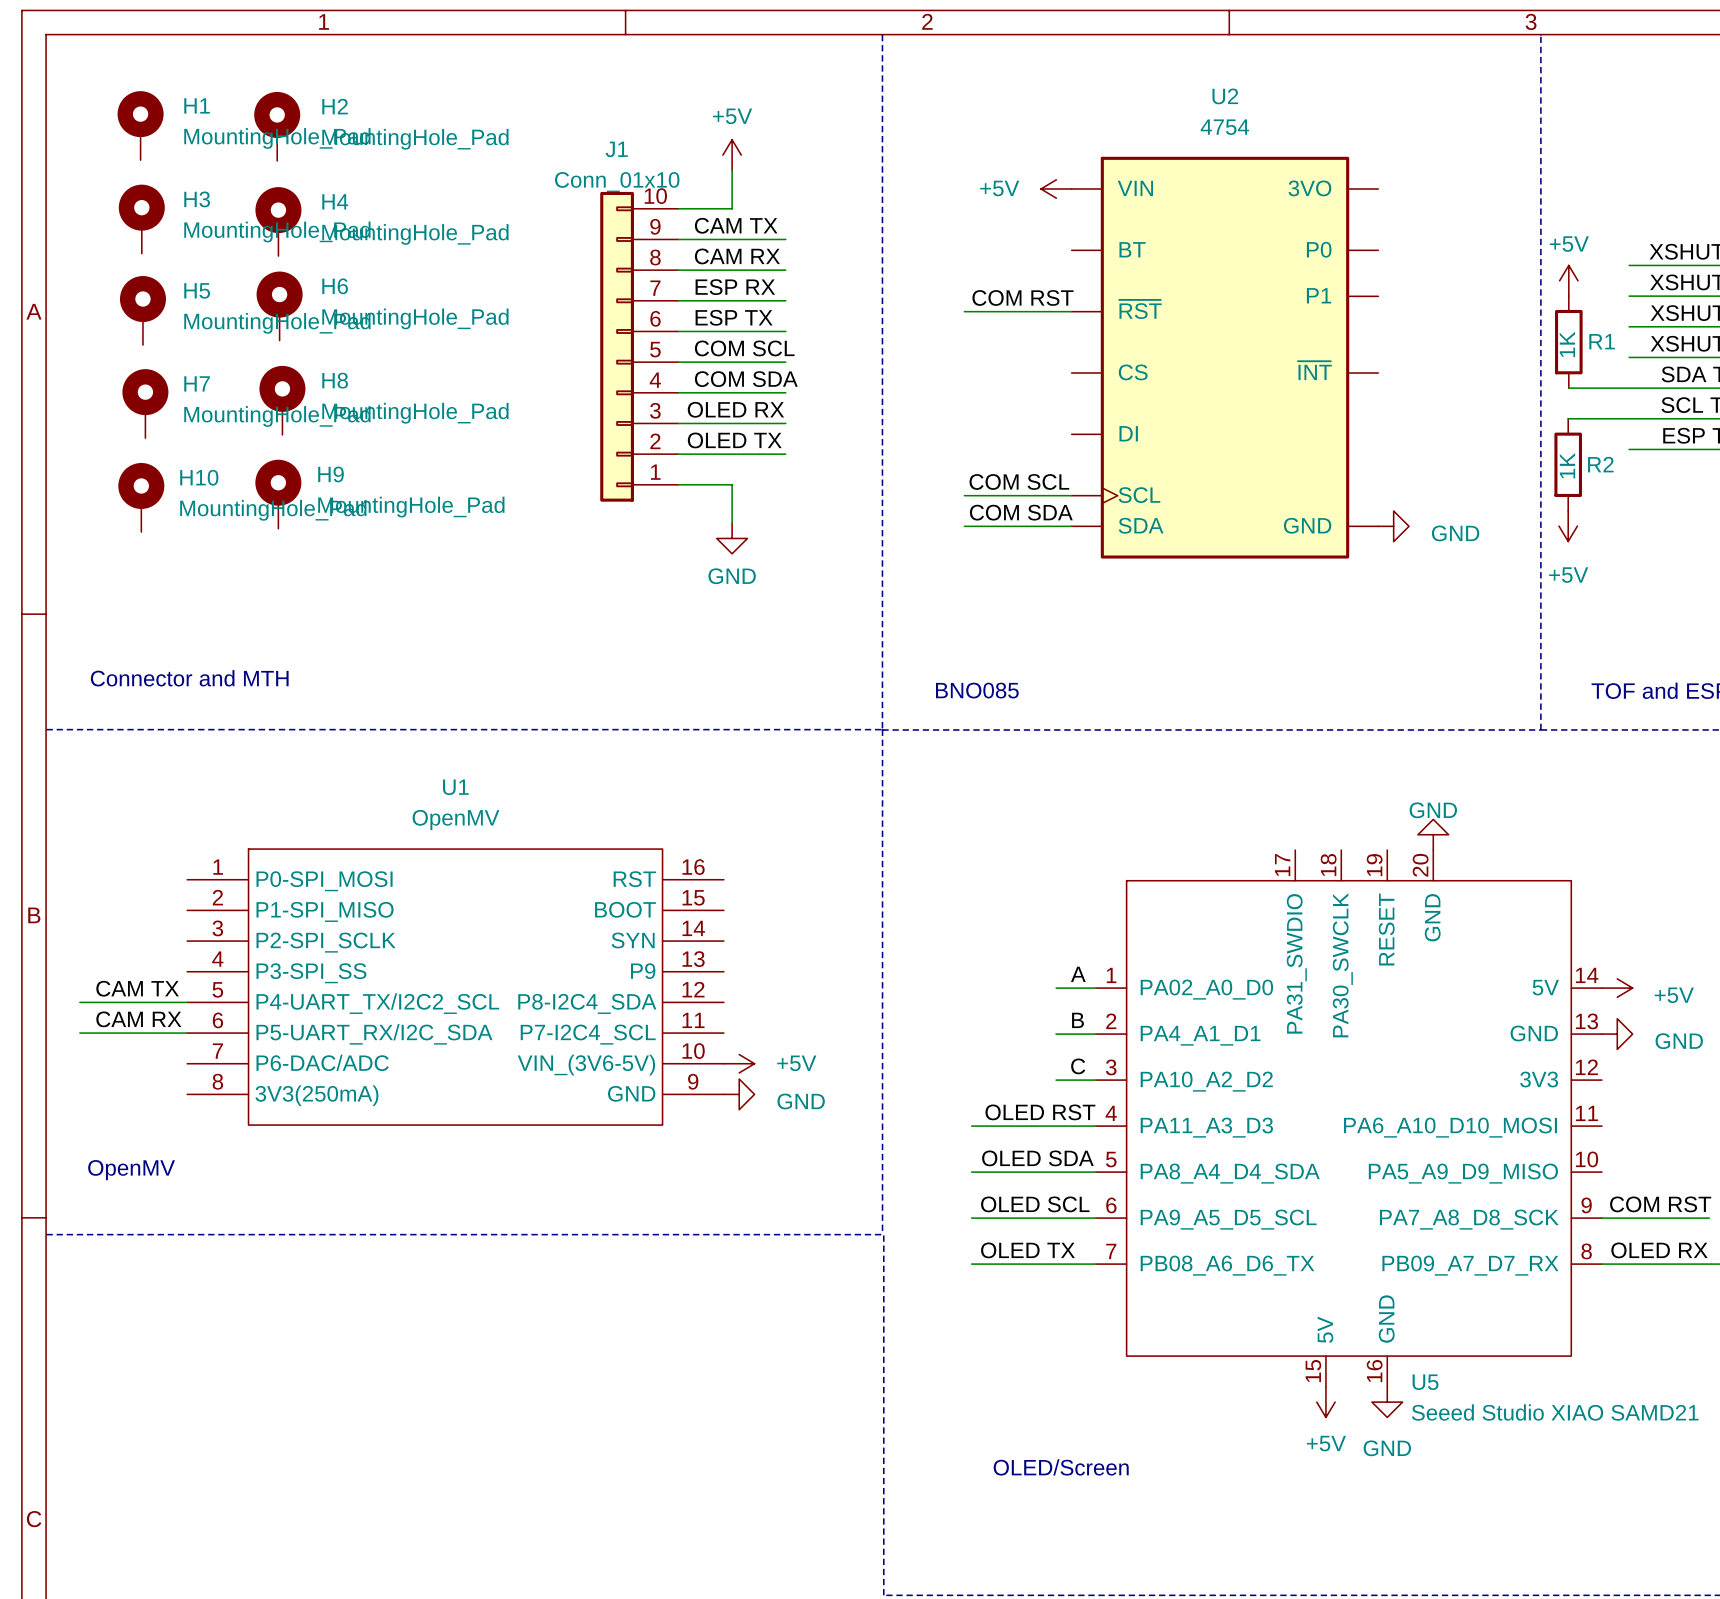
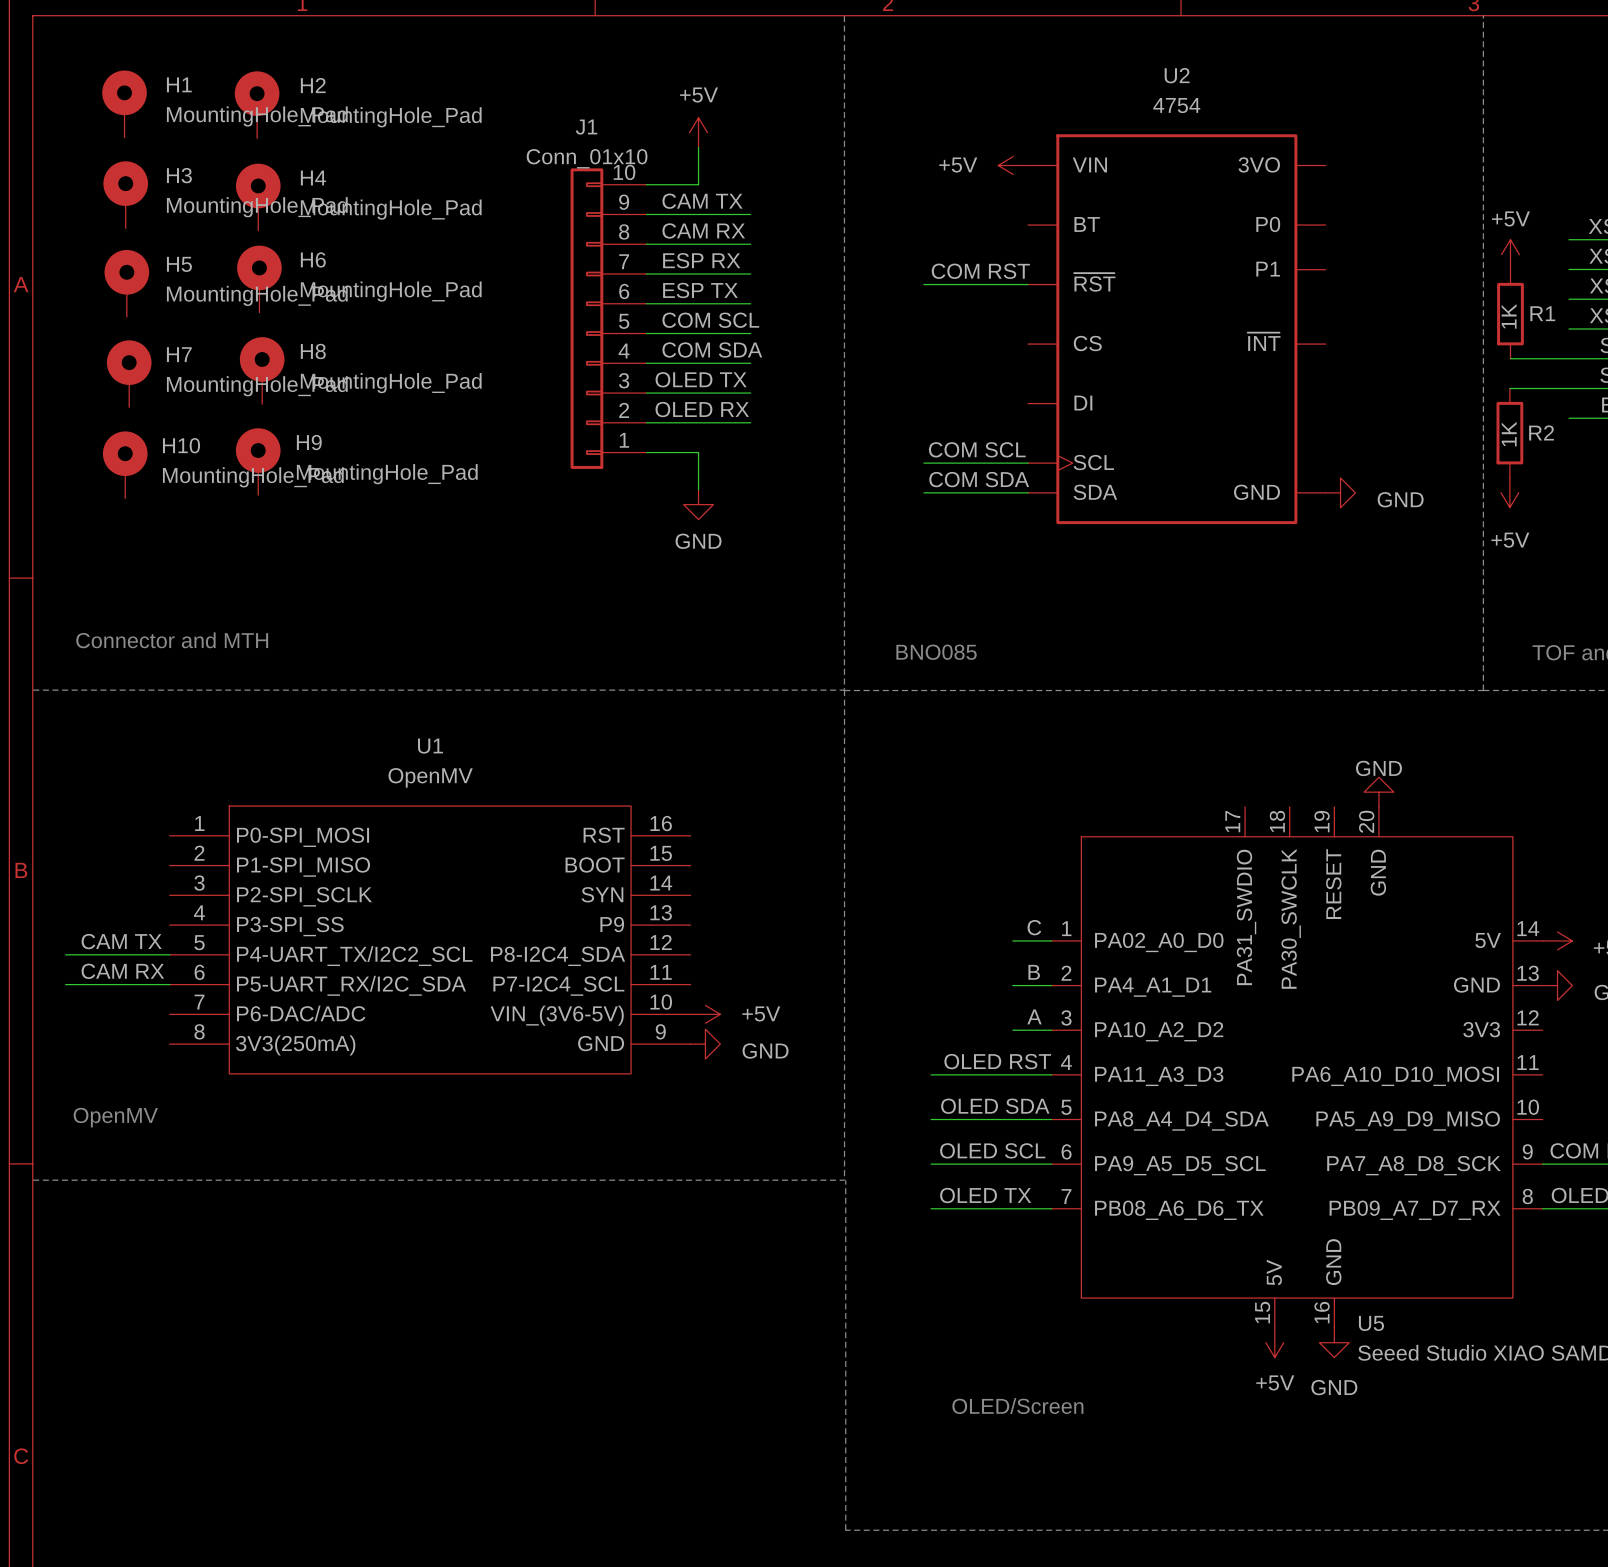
label: OLED RX (735, 409) -> OLED TX (701, 379)
label: OLED TX (734, 440) -> OLED RX (702, 409)
label: A (1078, 974) -> C (1034, 927)
label: C (1078, 1066) -> A (1034, 1016)

